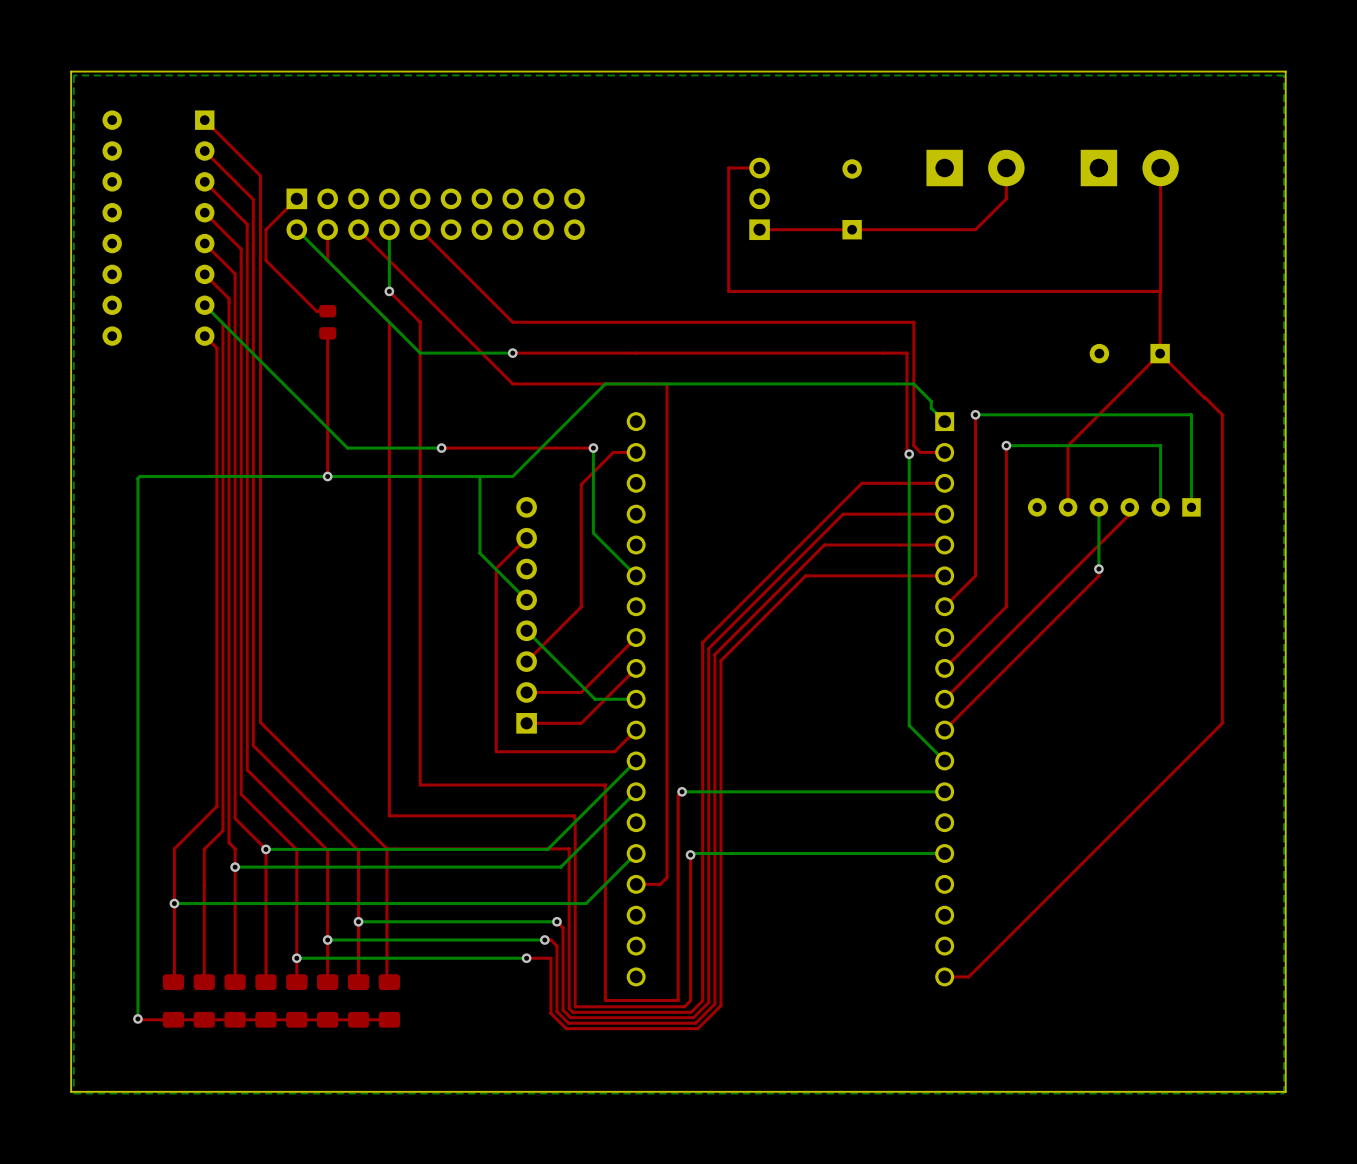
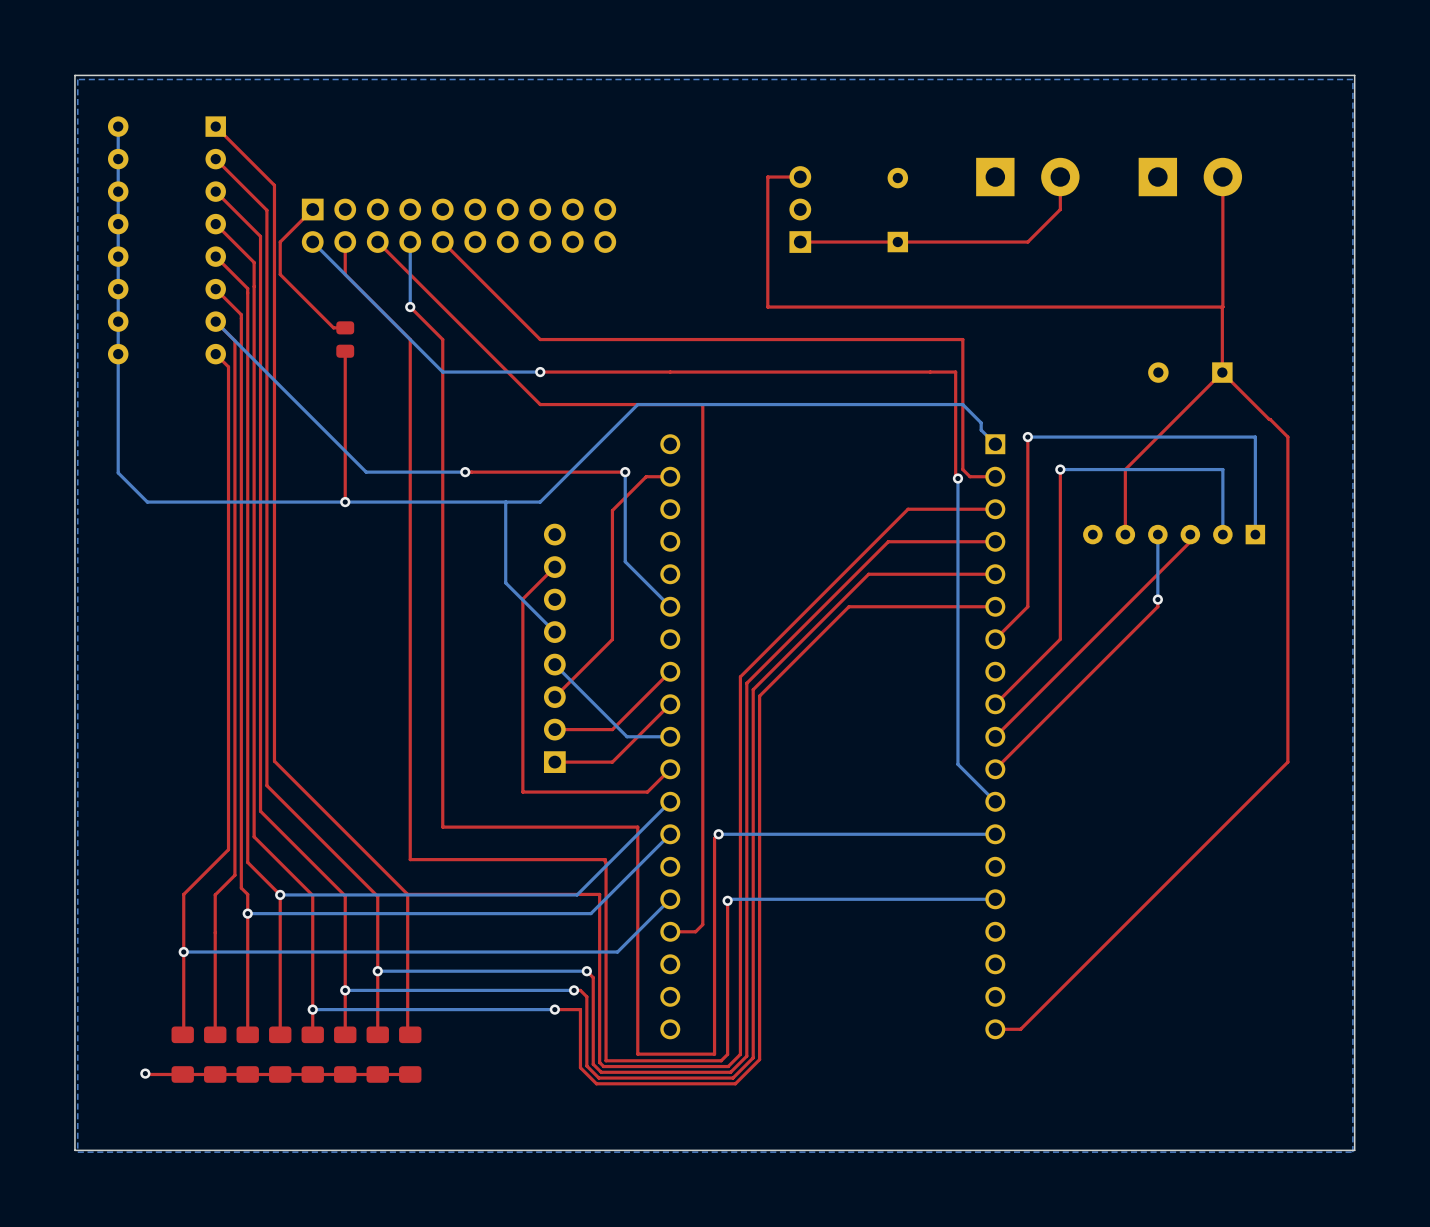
bottom track: (139, 476) (137, 478) (137, 1018) -> (147, 502) (118, 472) (118, 126)

